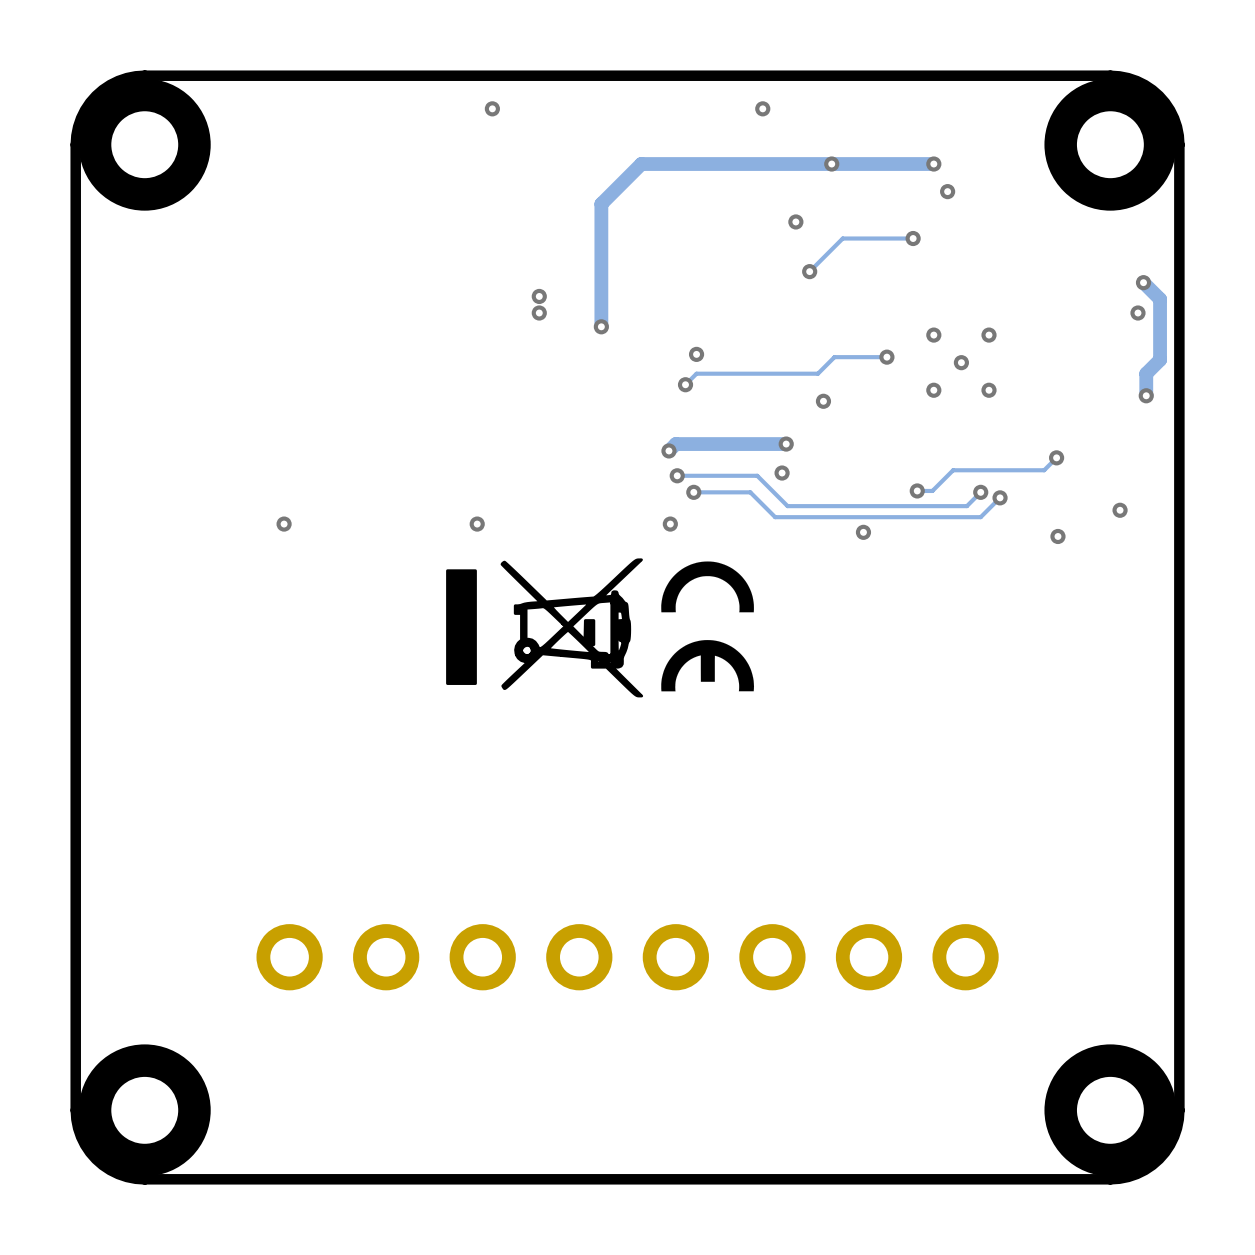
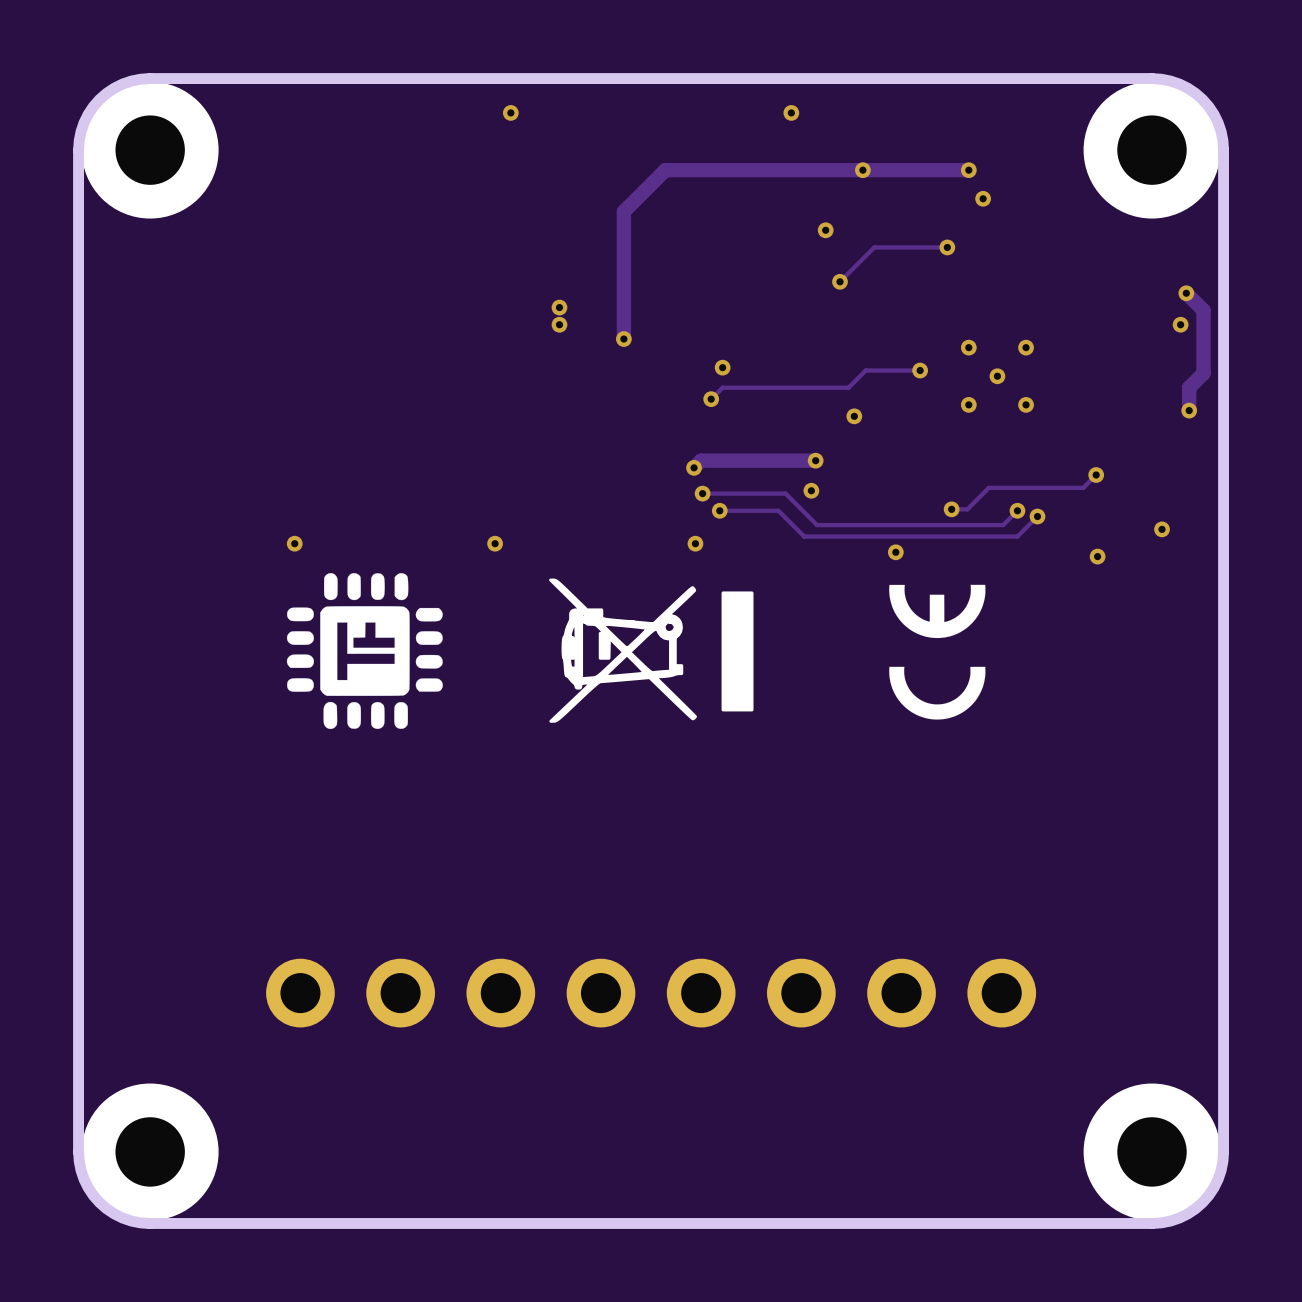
drawing: none -> [286, 573, 443, 730]
drawing: none -> [549, 578, 754, 723]
drawing: [446, 558, 755, 698] -> none
drawing: none -> [889, 584, 986, 720]

